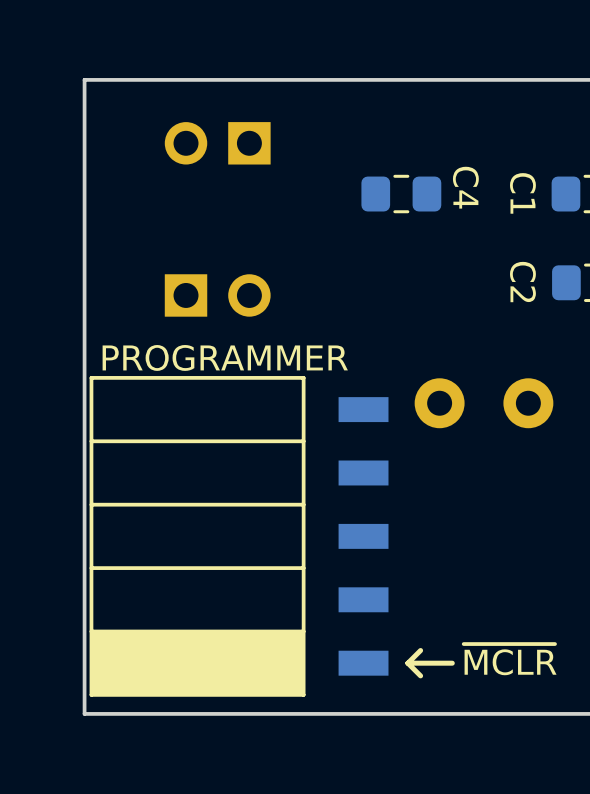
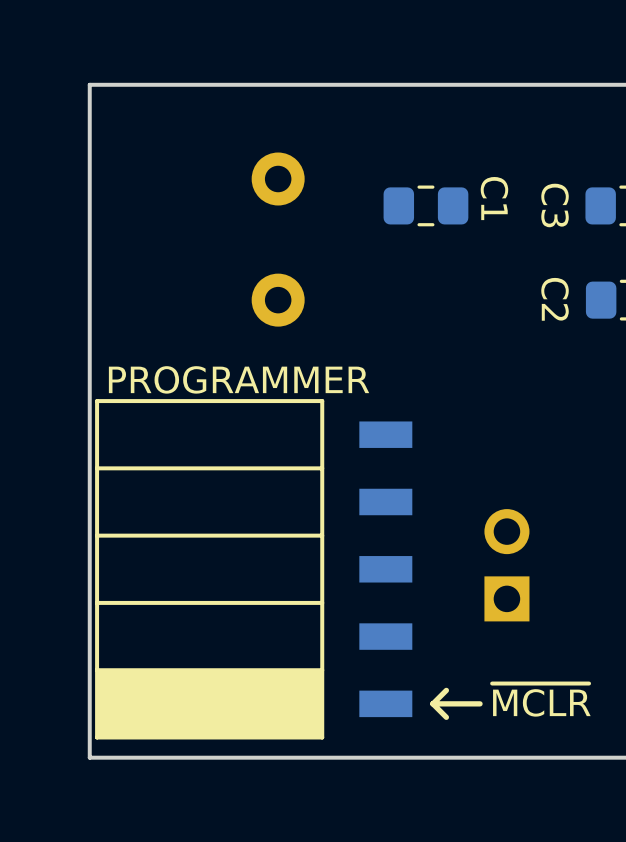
part: (217, 143) -> none
part: none -> (278, 179)
C4 name: C4 (465, 187) -> C1 (494, 198)
C1 name: C1 (522, 193) -> C3 (555, 205)
part: none -> (278, 300)
part: (217, 295) -> none
part: (439, 403) -> none
part: (528, 403) -> none
part: none -> (506, 565)

